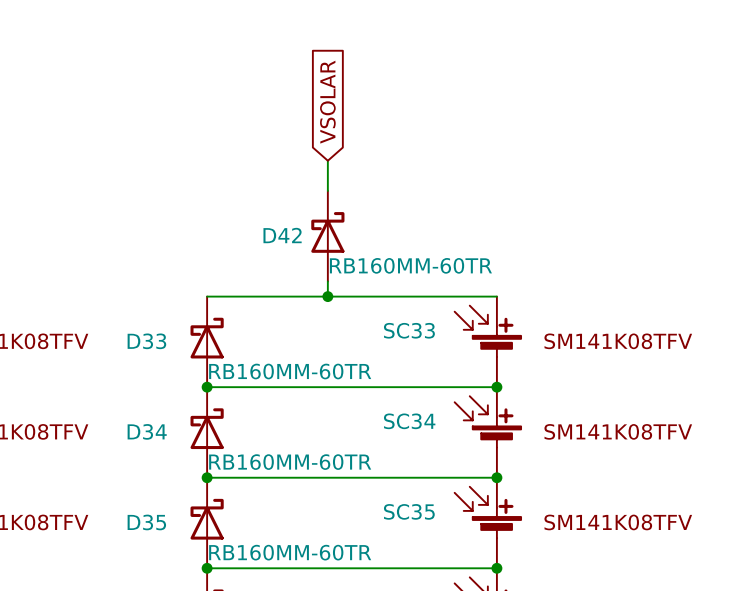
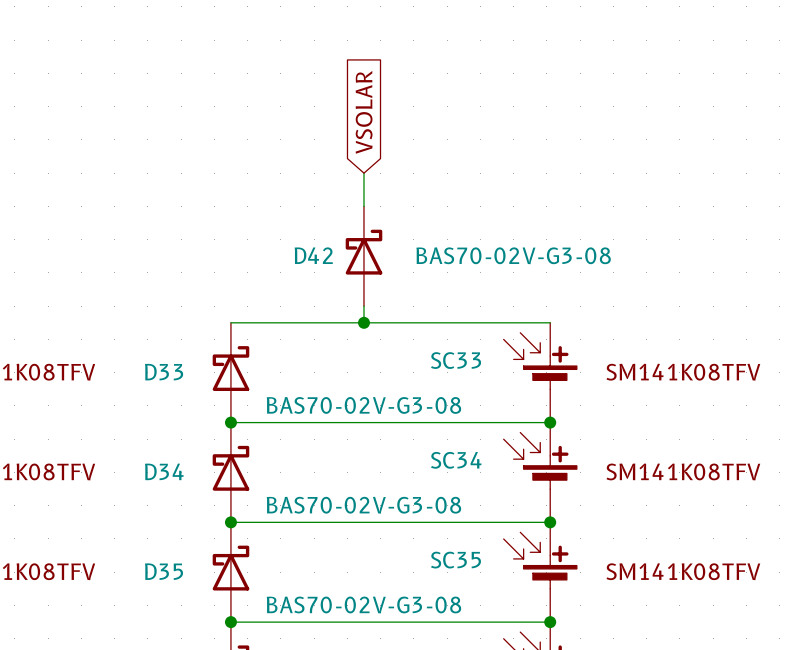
D42 value: RB160MM-60TR (410, 265) -> BAS70-02V-G3-08 (513, 255)
D33 value: RB160MM-60TR (290, 371) -> BAS70-02V-G3-08 (363, 405)
D34 value: RB160MM-60TR (290, 462) -> BAS70-02V-G3-08 (363, 505)
D35 value: RB160MM-60TR (290, 552) -> BAS70-02V-G3-08 (363, 604)

